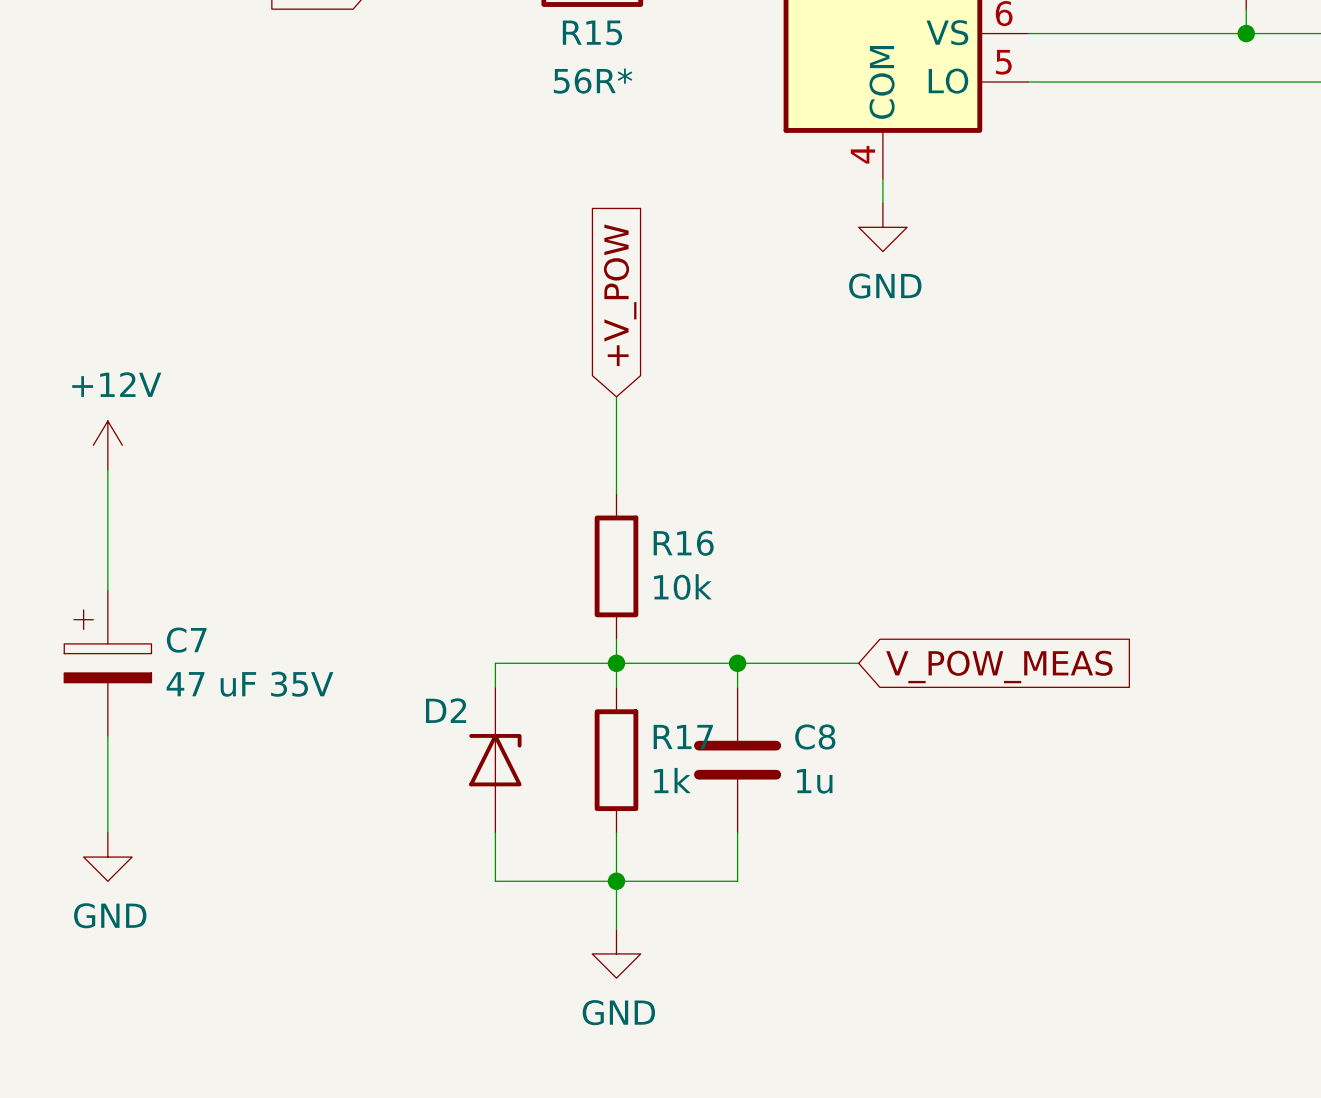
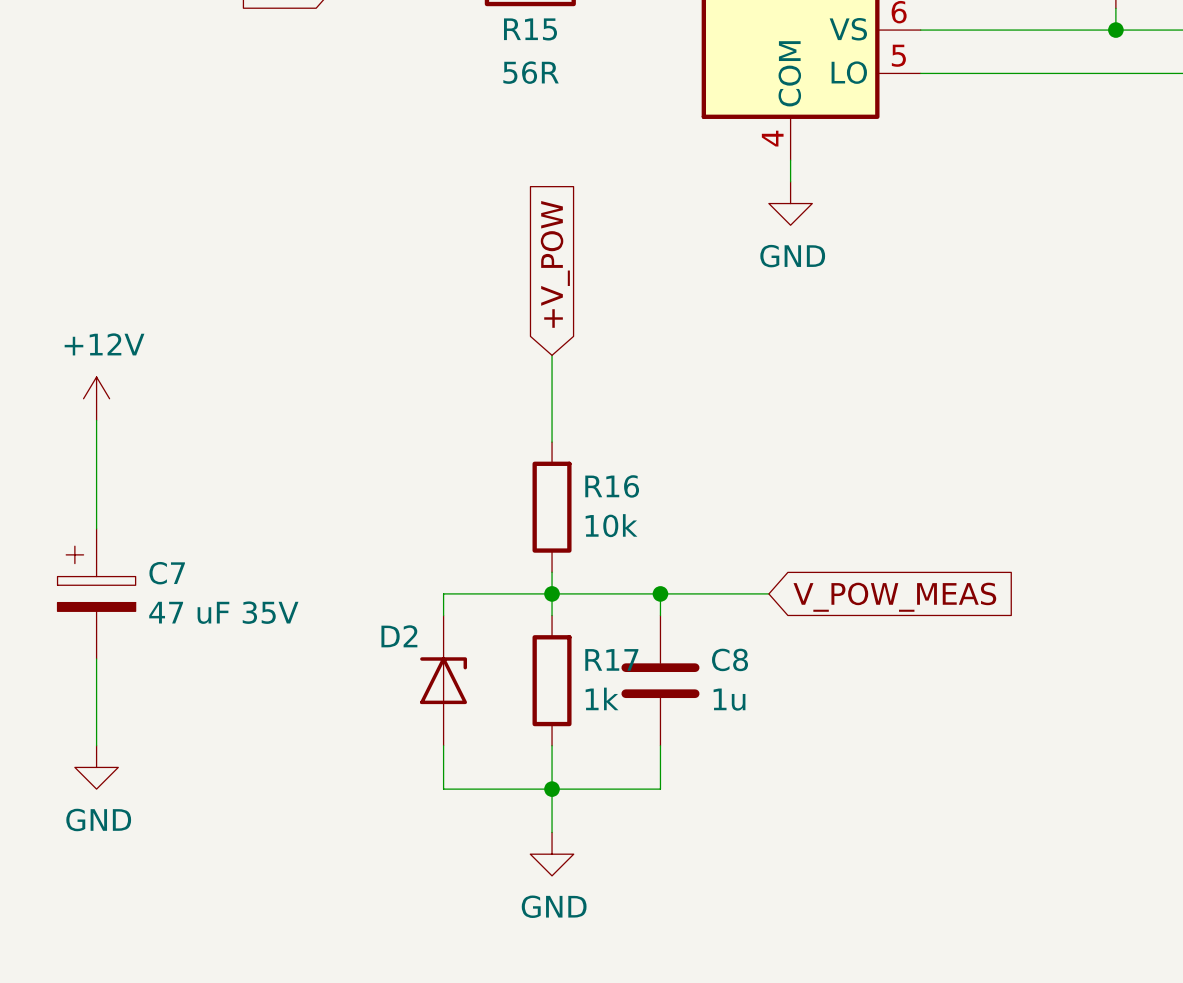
R15 value: 56R* (593, 81) -> 56R (531, 72)

